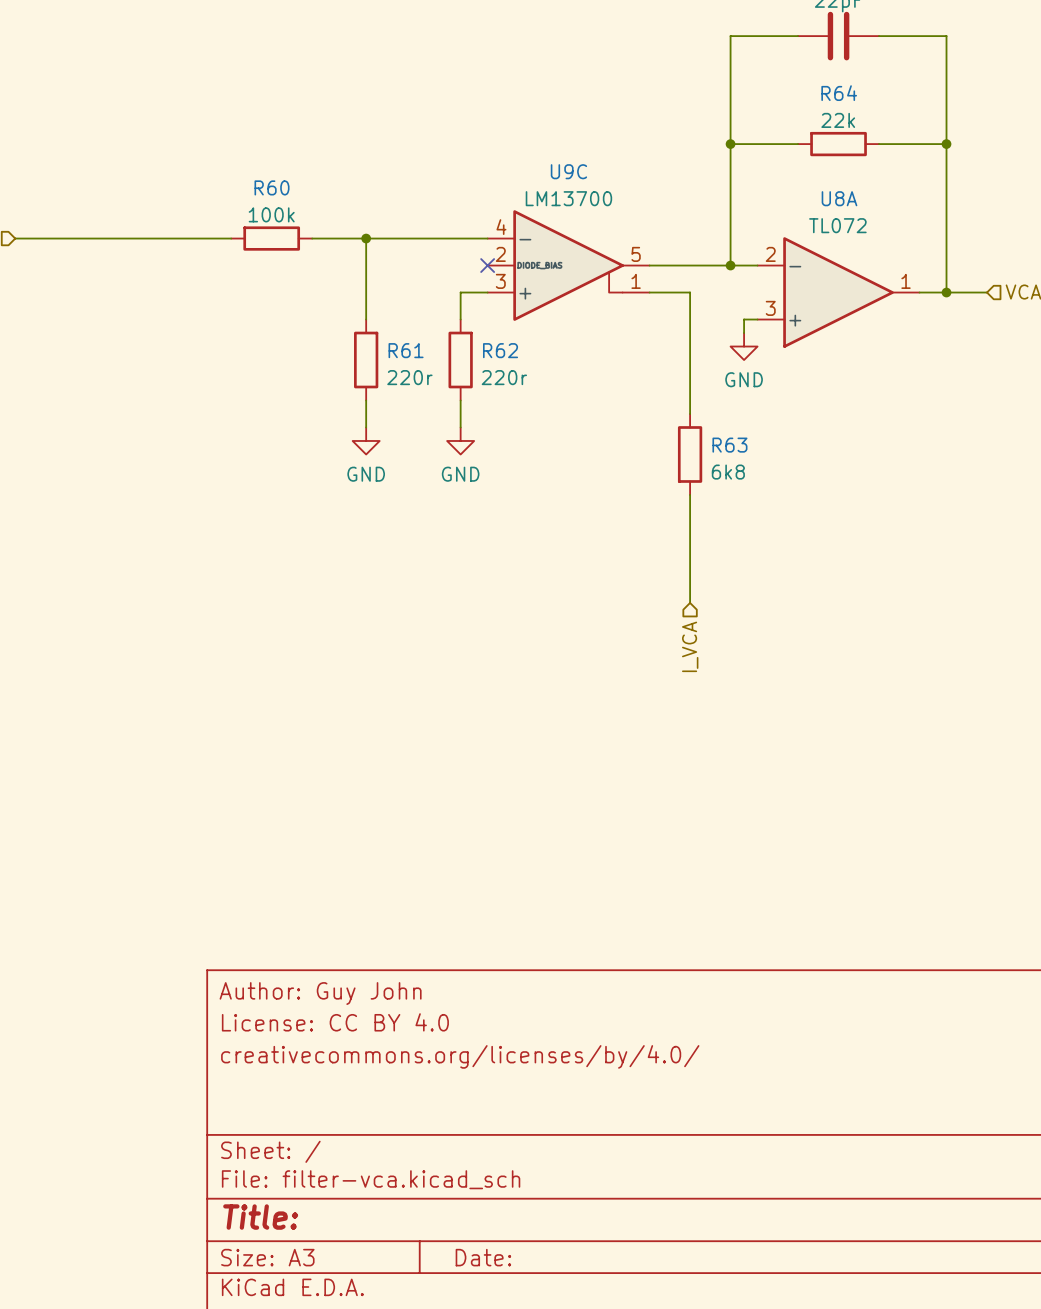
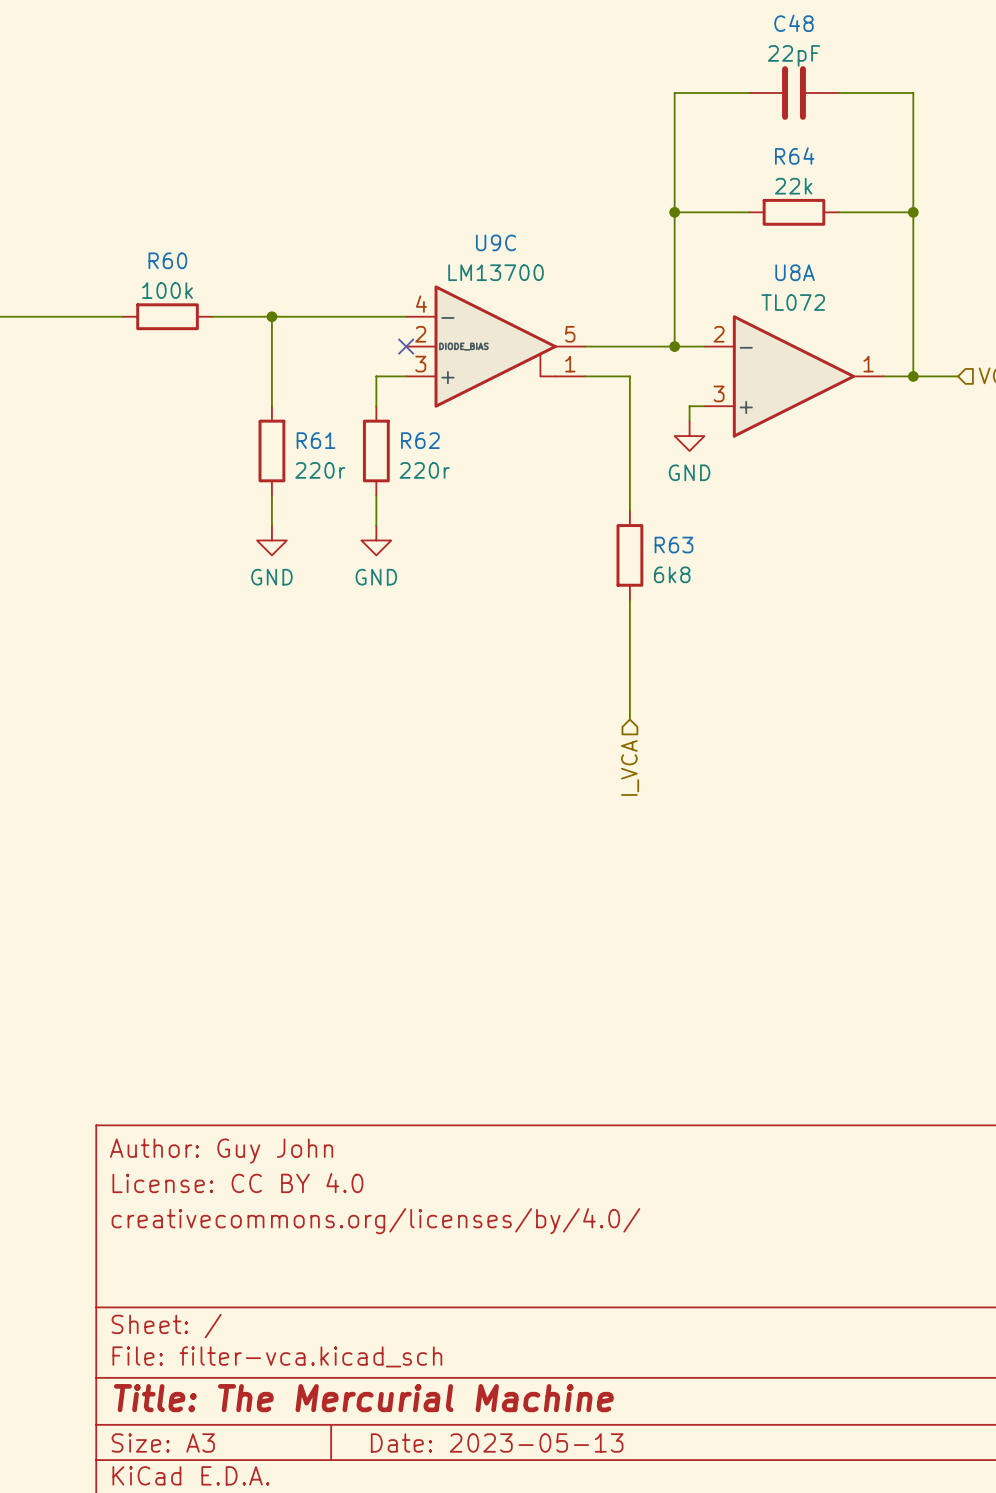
title block: Title: (260, 1217) -> Title: The Mercurial Machine (363, 1398)
title block: Date: (483, 1257) -> Date: 2023-05-13 (497, 1442)

